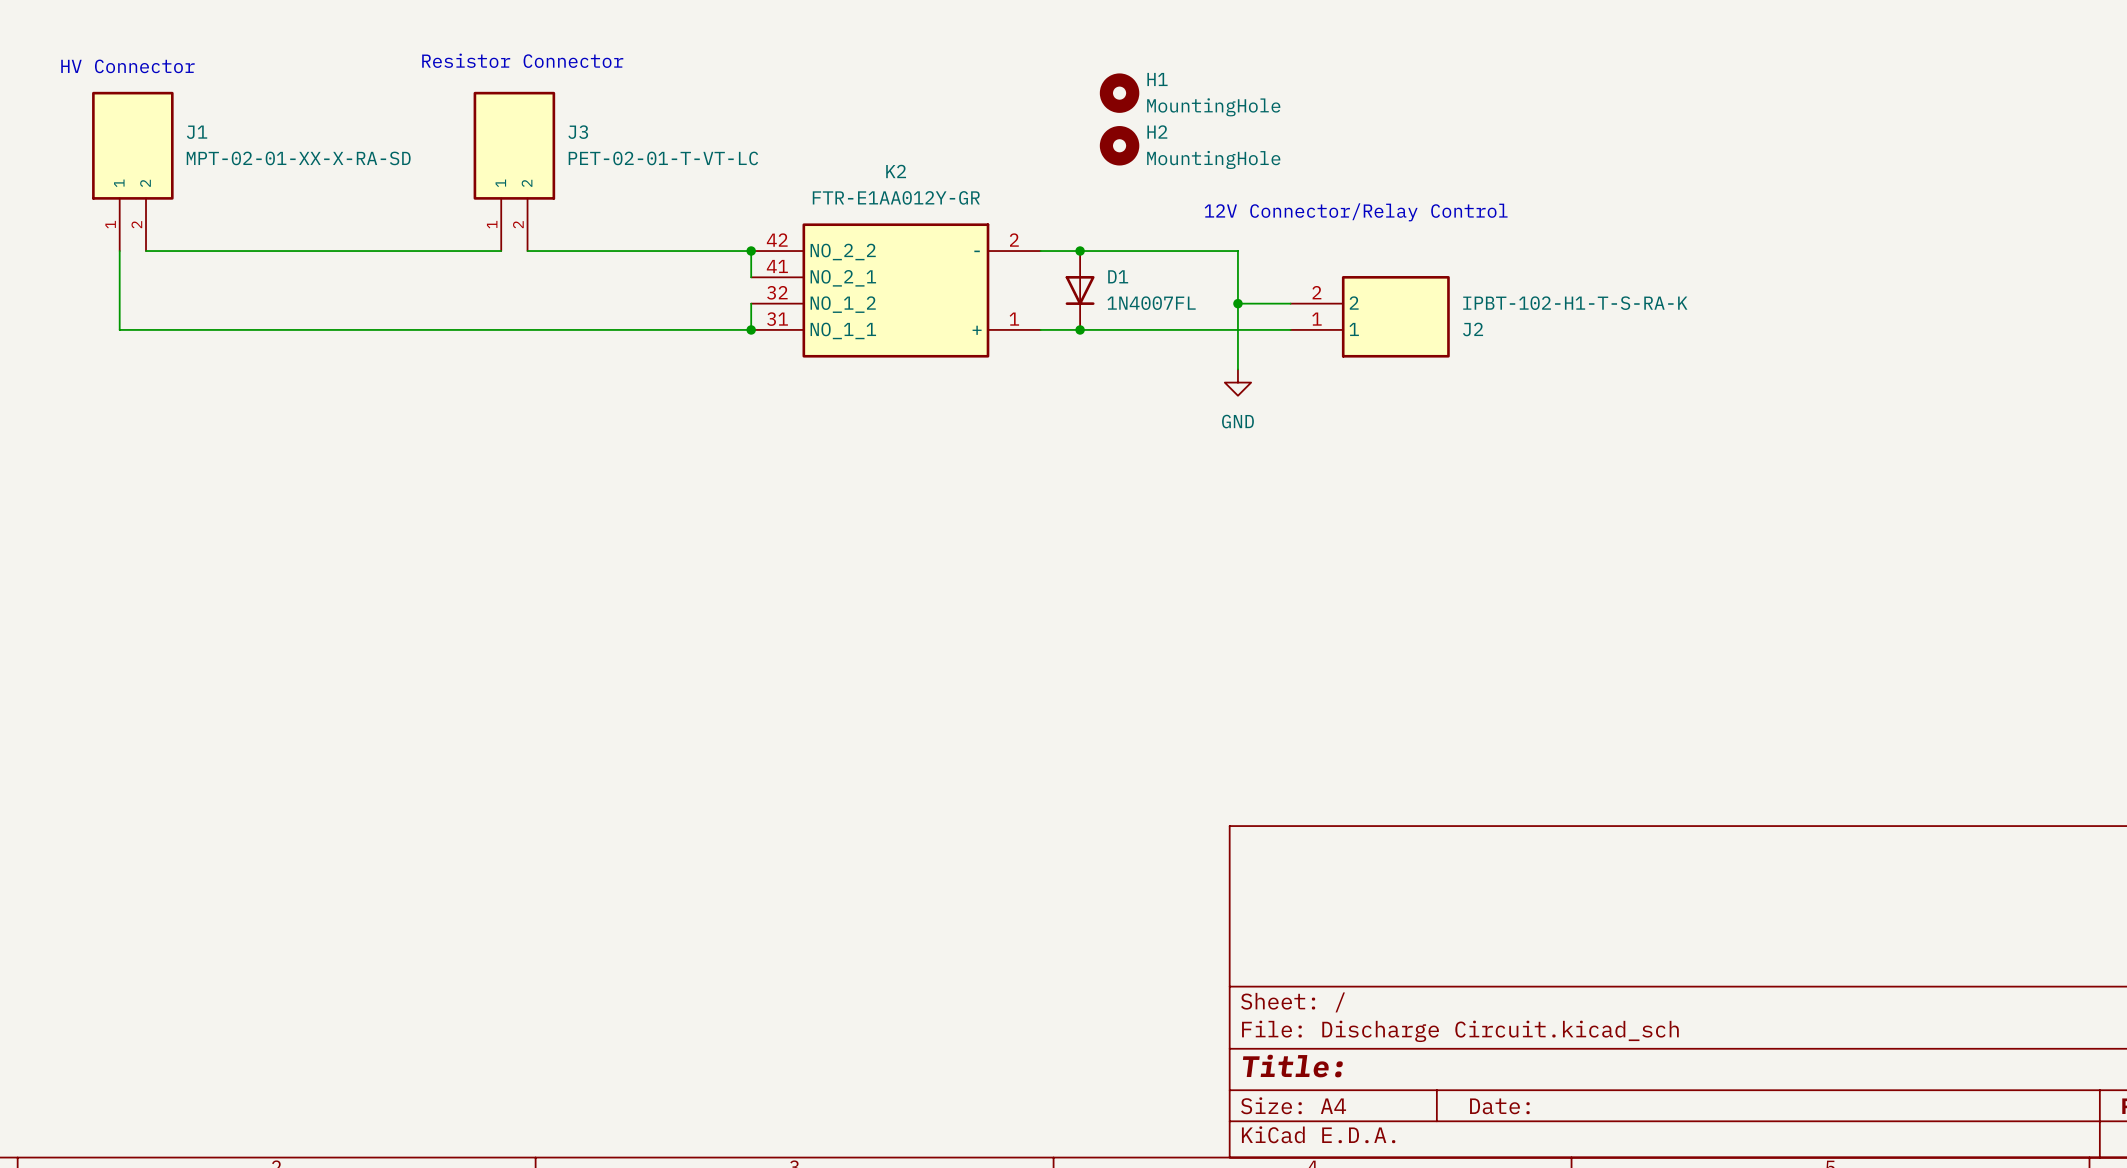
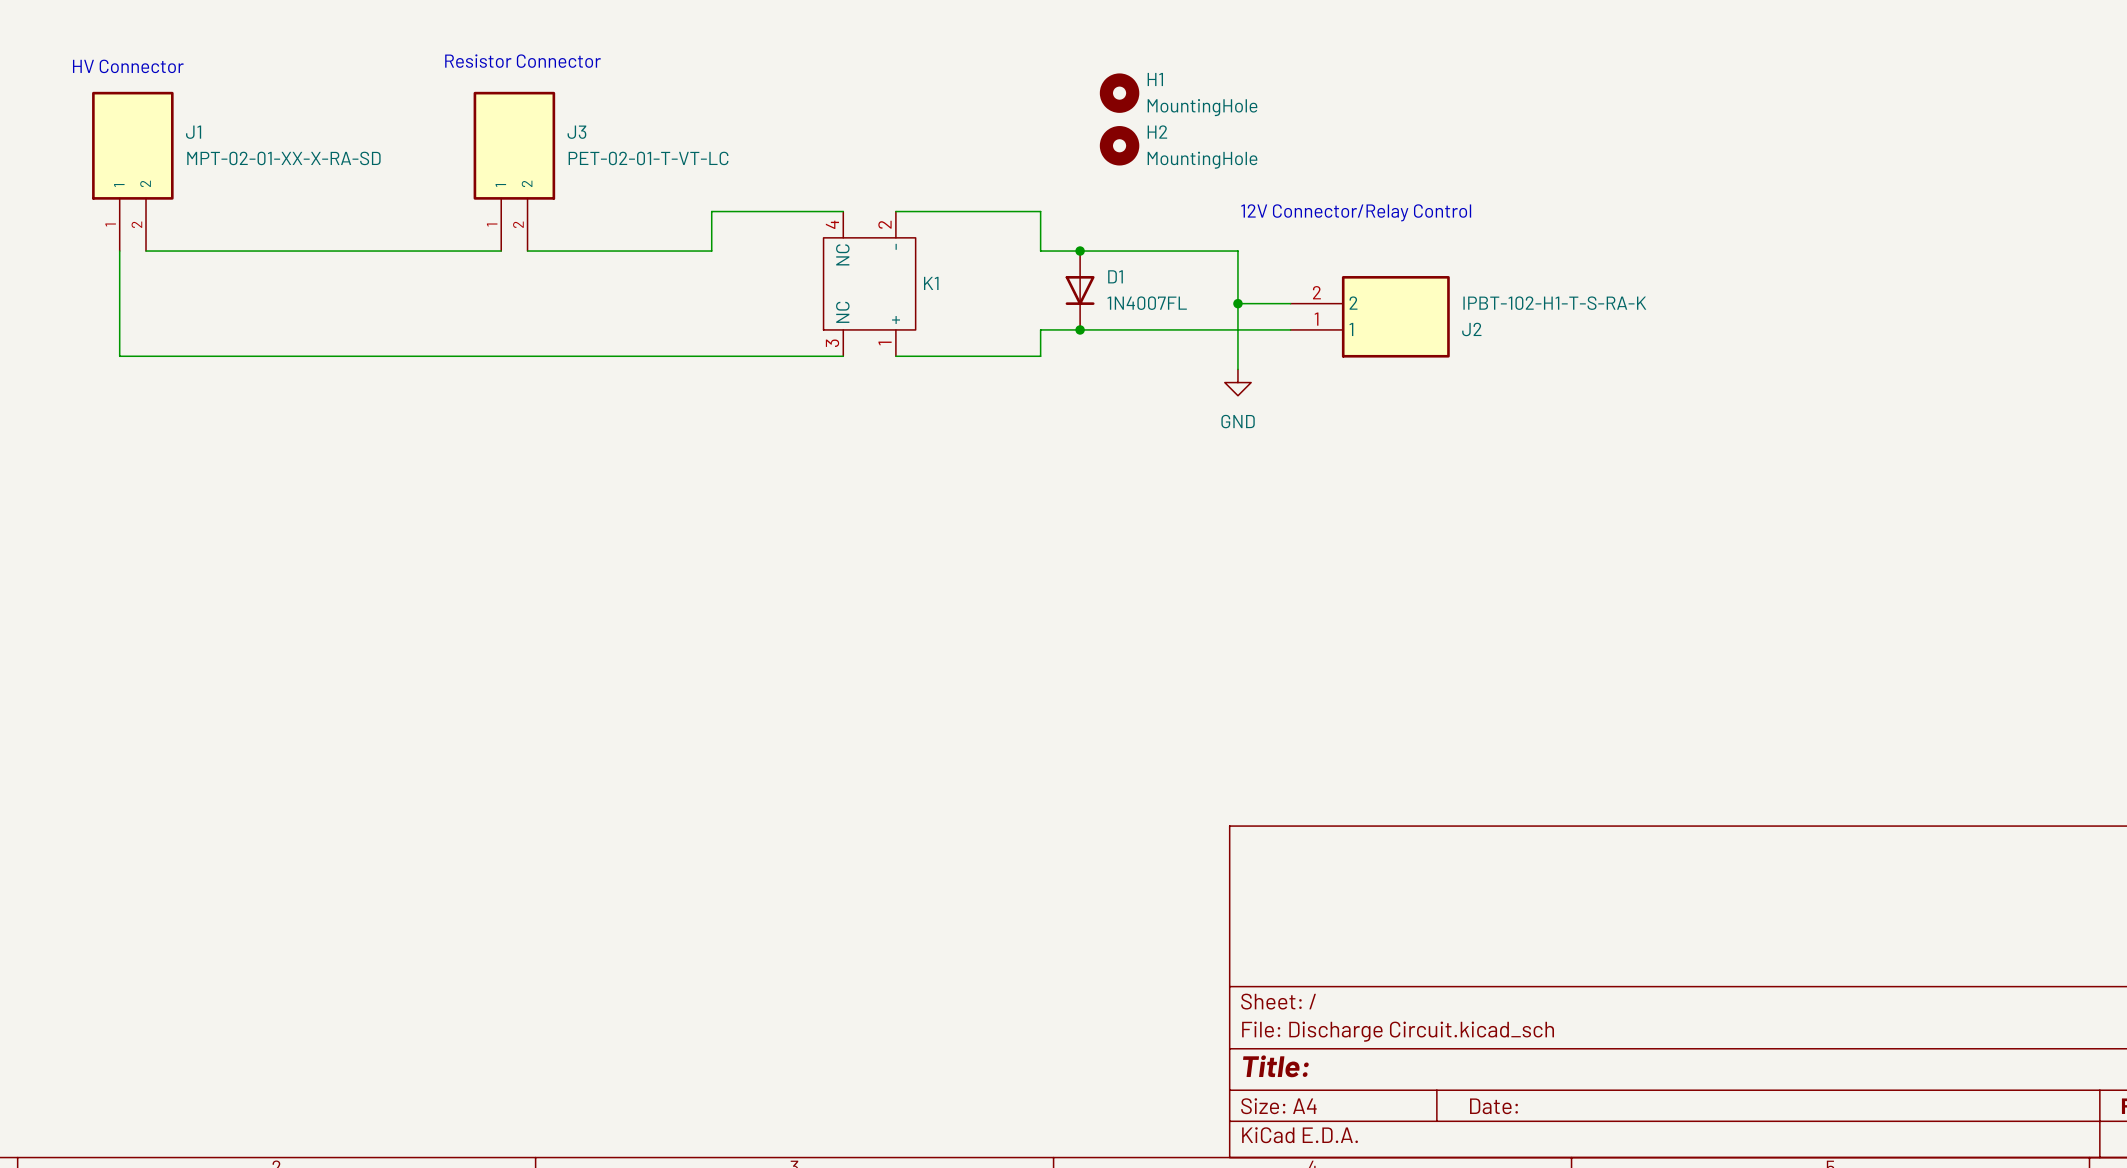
wire: none -> (895, 211) (1040, 211) (1040, 251)
wire: (711, 251) (751, 251) (751, 277) -> (711, 251) (711, 211) (843, 211)
junction: (751, 251) -> none
K1: none -> (869, 283)
K2: FTR-E1AA012Y-GR (895, 290) -> none
wire: (751, 303) (751, 329) (119, 329) -> (843, 356) (119, 356) (119, 329)
junction: (751, 329) -> none
wire: none -> (1040, 329) (1040, 356) (895, 356)

